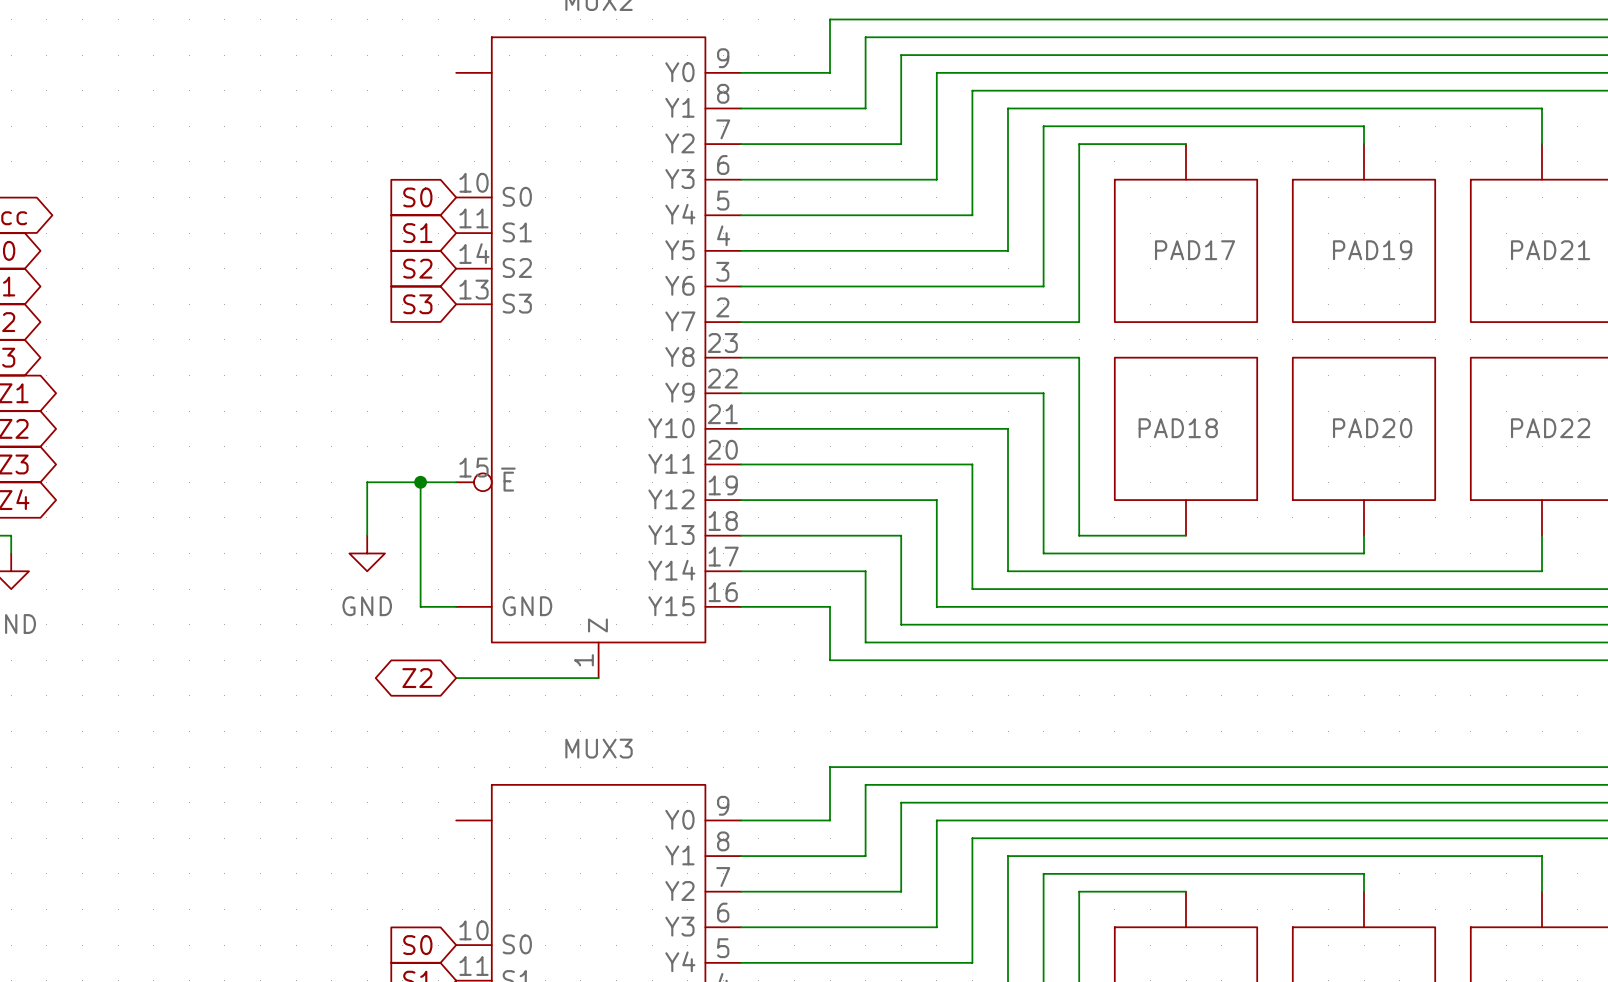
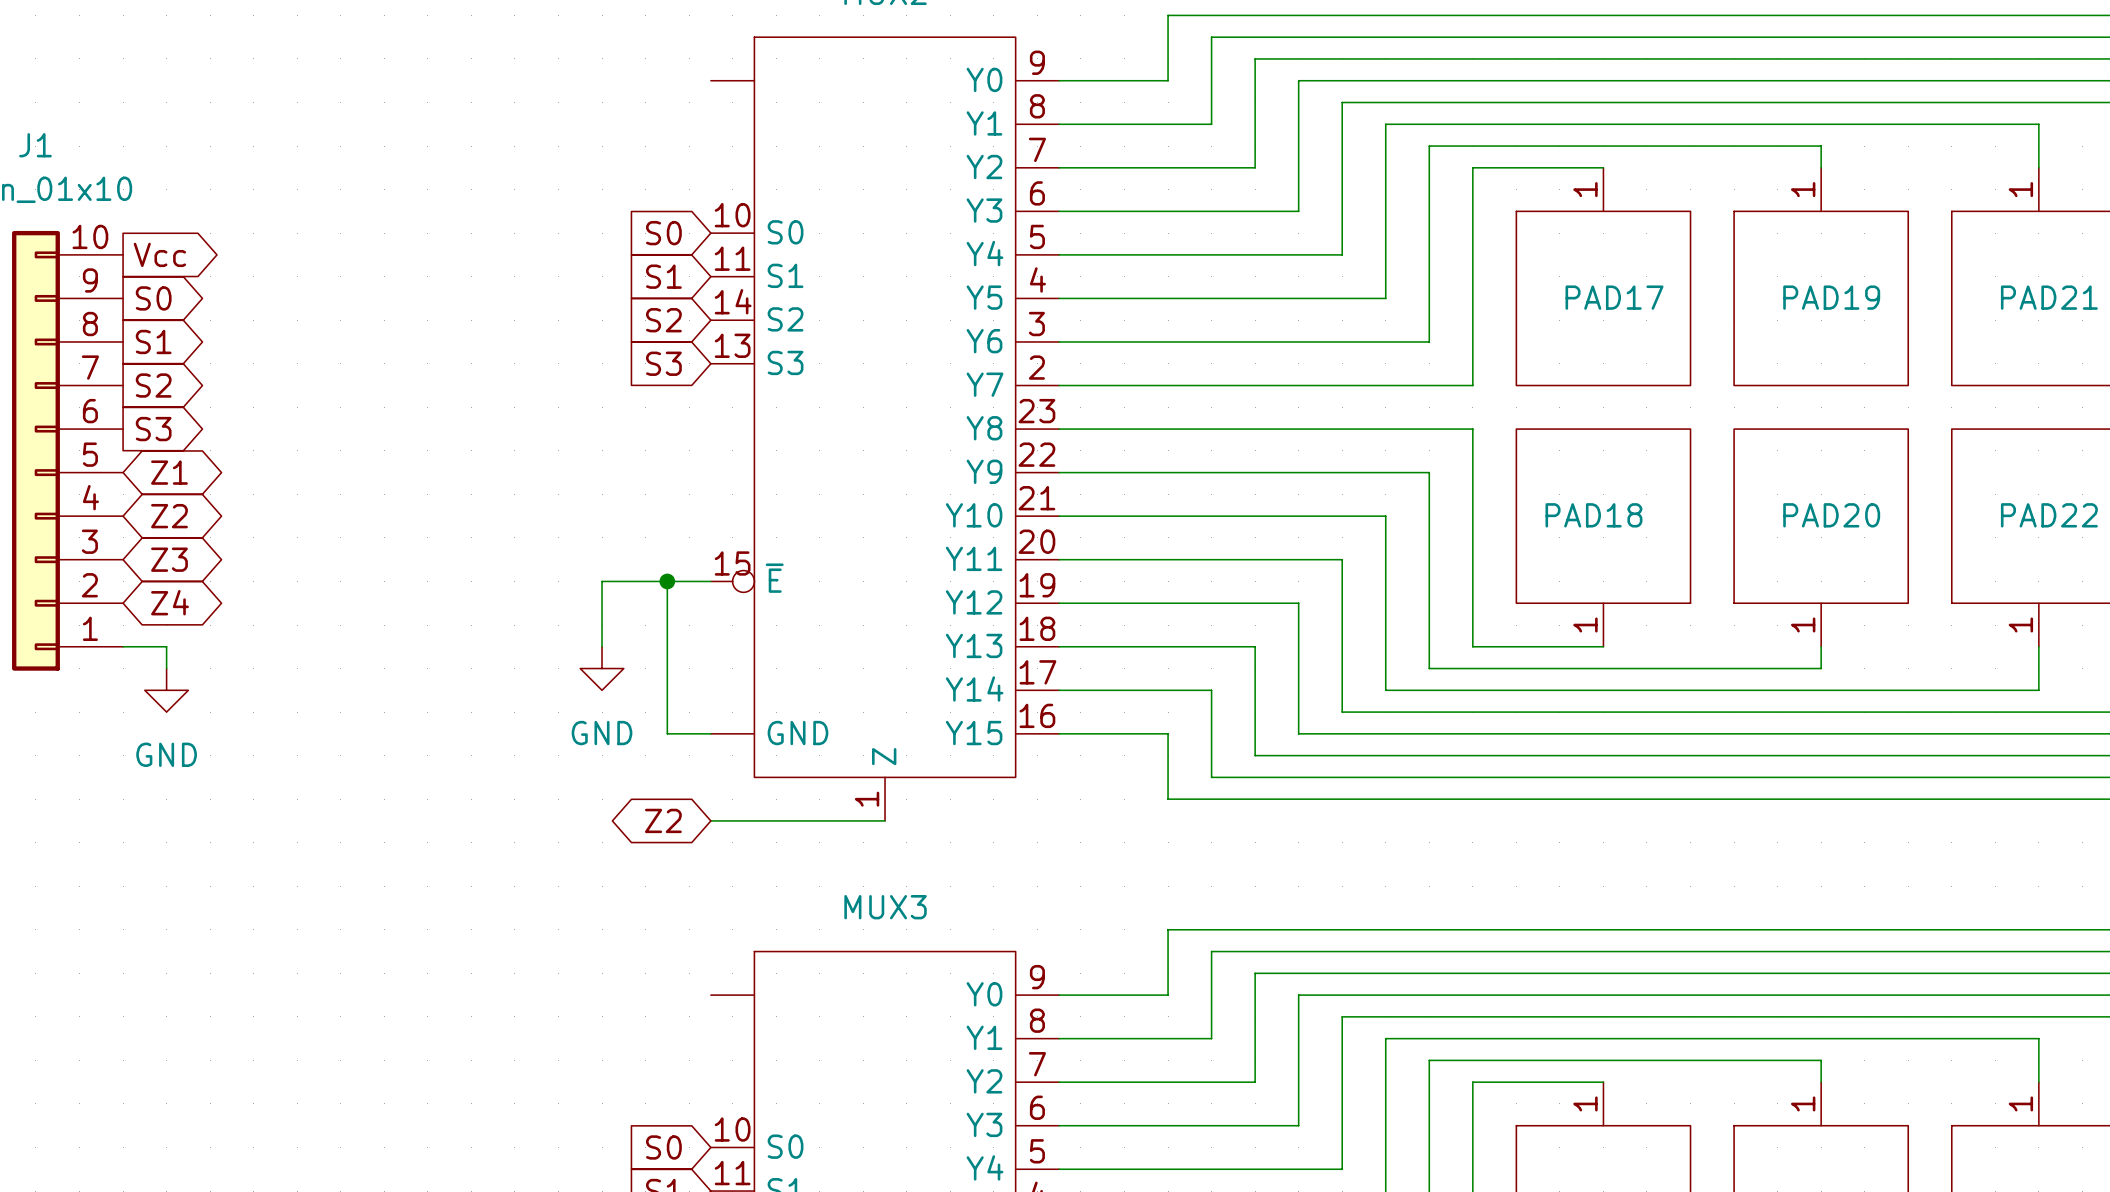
PAD17 pin number: none -> 1 (1585, 189)
PAD19 pin number: none -> 1 (1803, 189)
PAD21 pin number: none -> 1 (2020, 189)
PAD18 pin number: none -> 1 (1585, 625)
PAD20 pin number: none -> 1 (1803, 625)
PAD22 pin number: none -> 1 (2020, 625)
part pin number: none -> 1 (1585, 1103)
part pin number: none -> 1 (1803, 1103)
part pin number: none -> 1 (2020, 1103)

